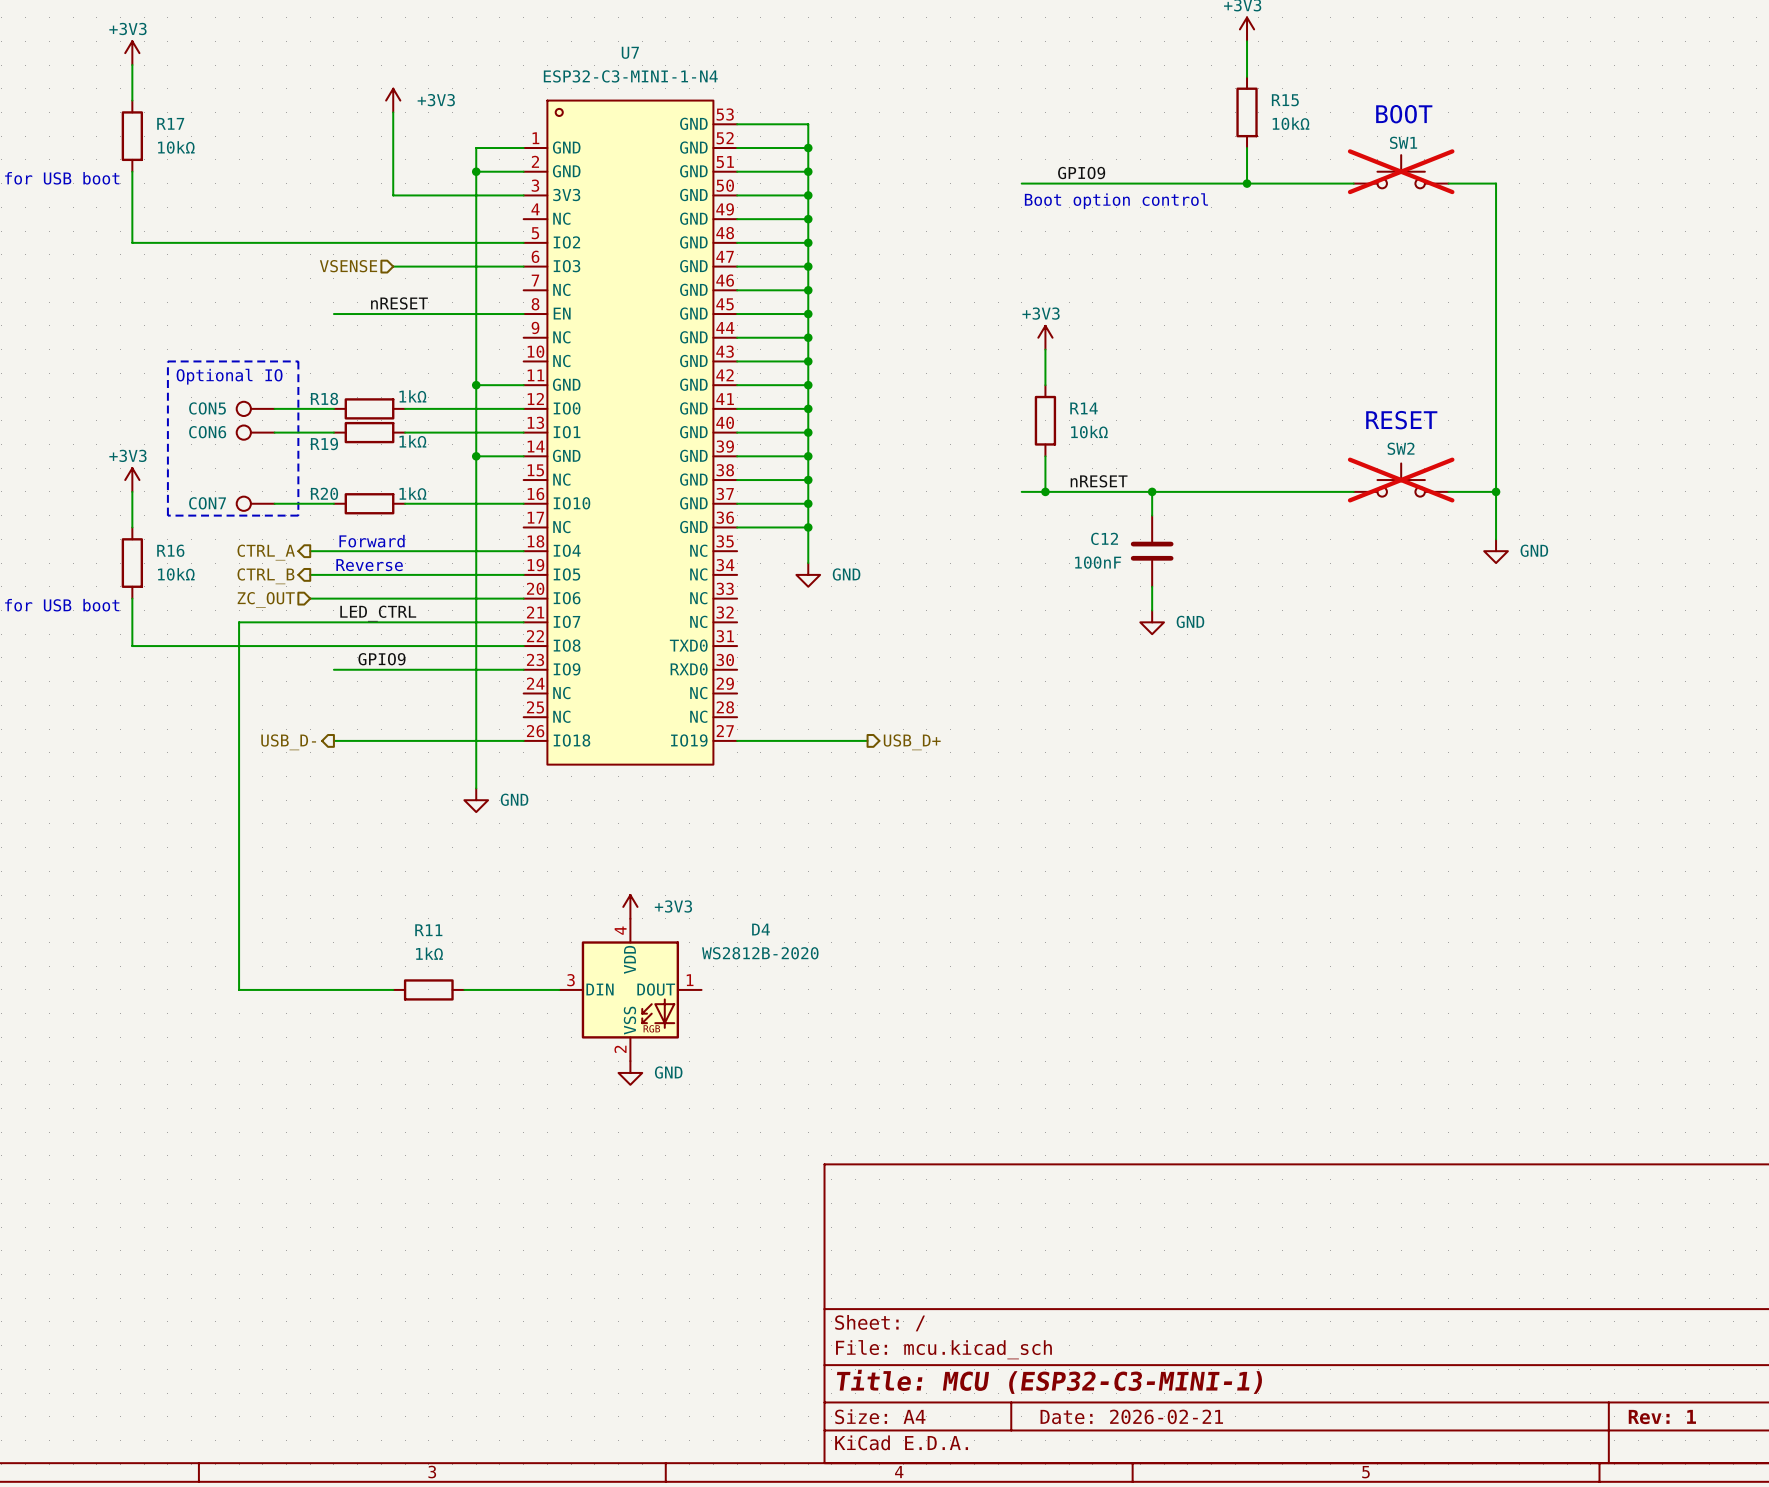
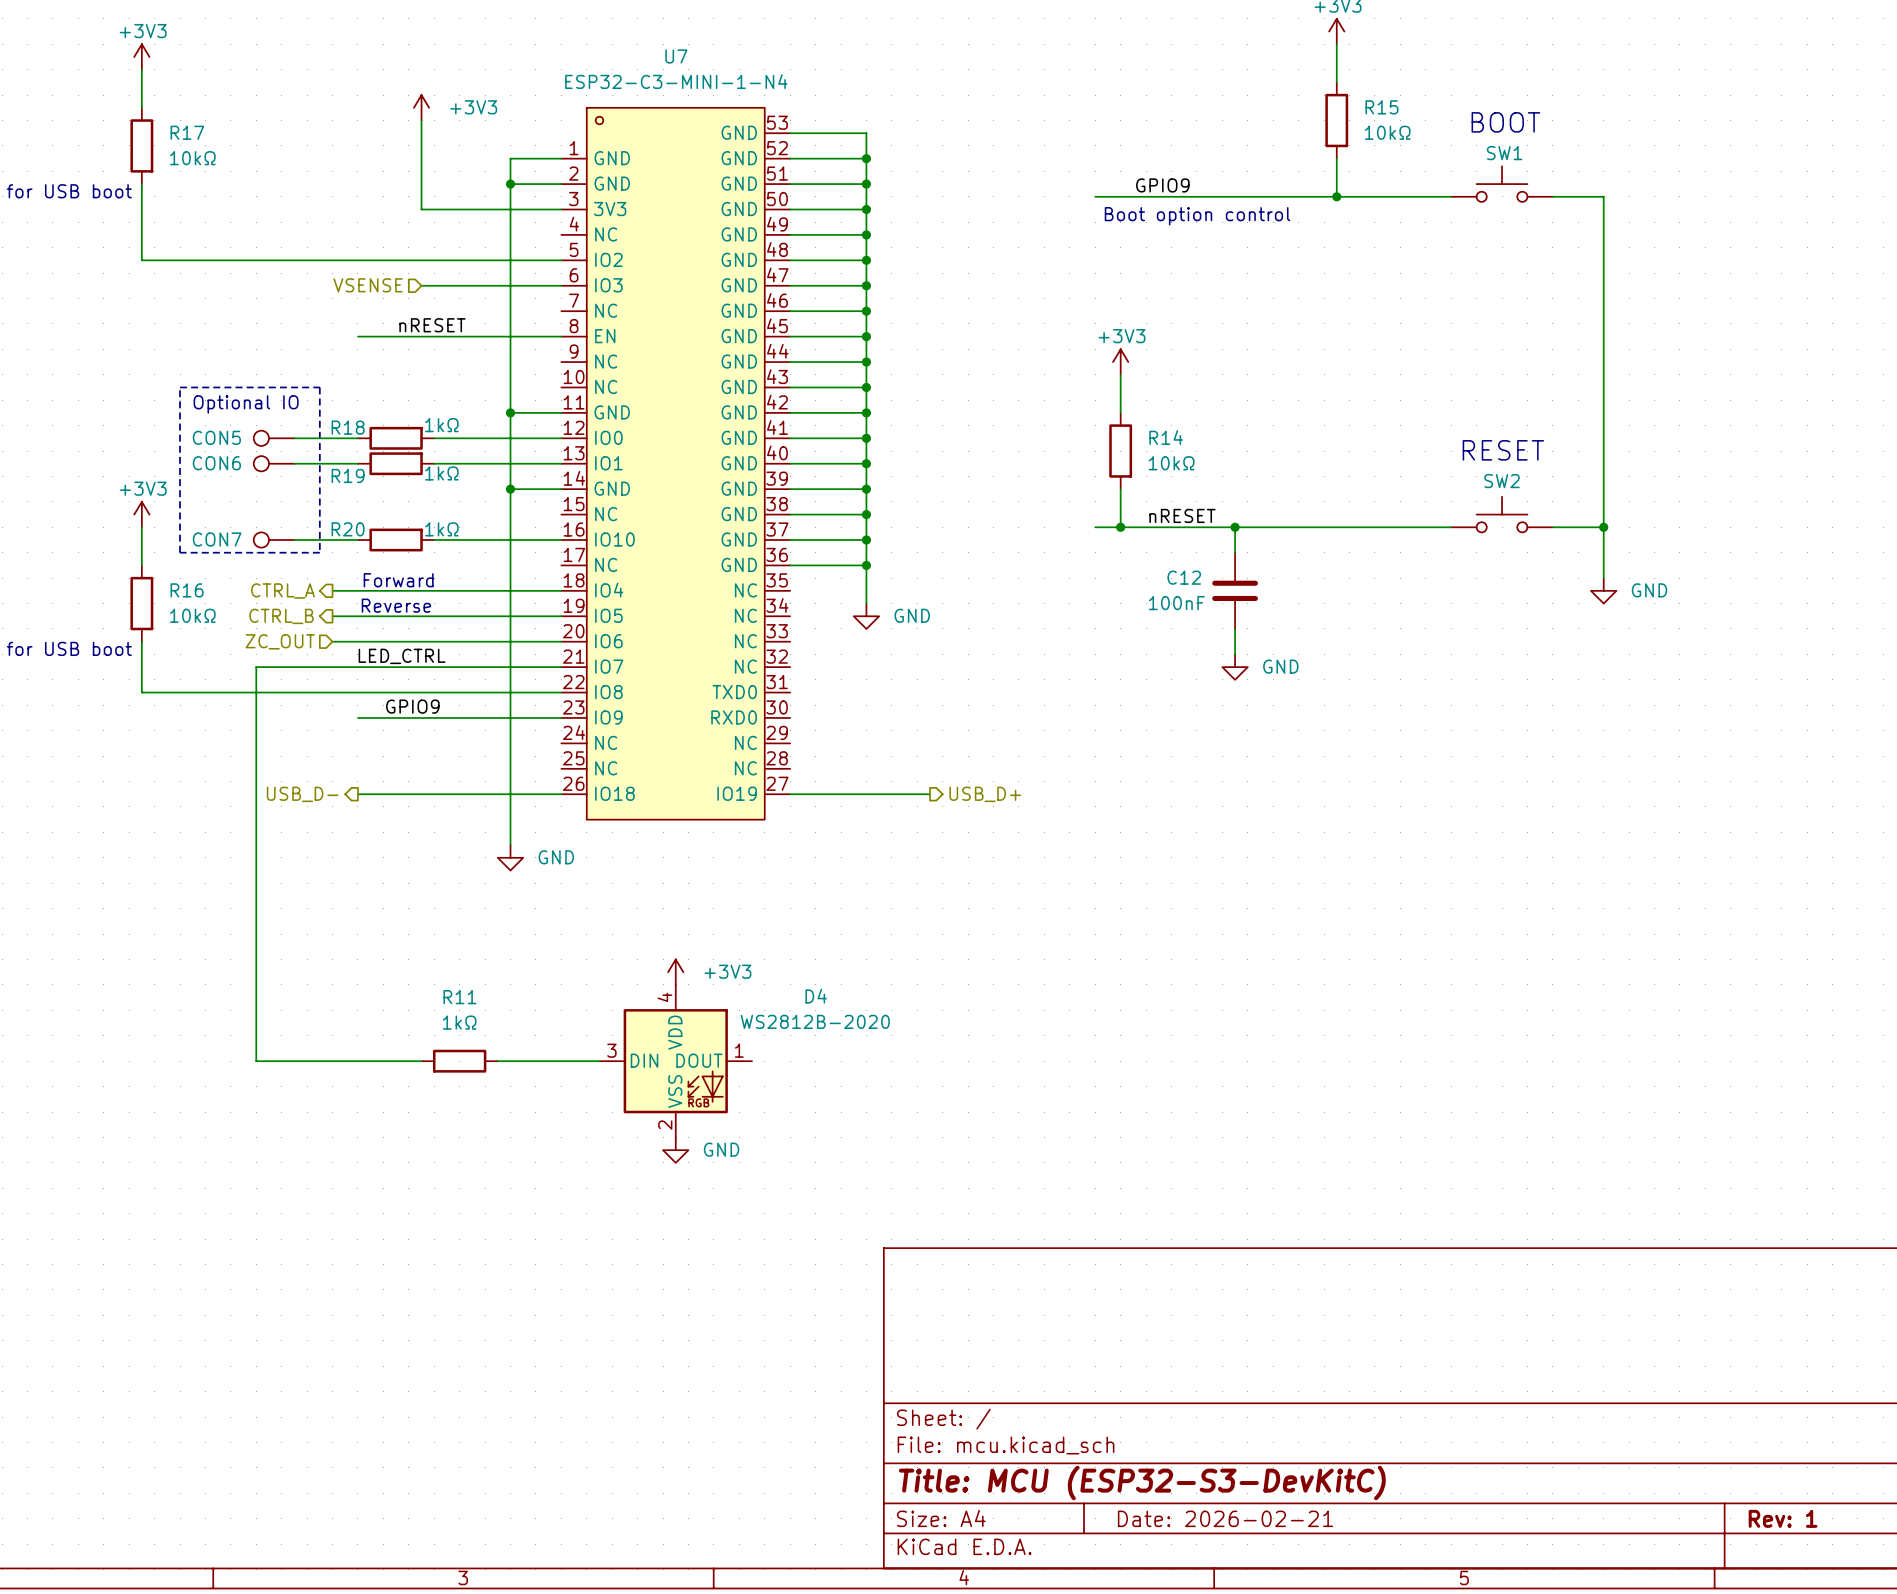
SW1 do-not-place cross: (1401, 171) -> none
SW2 do-not-place cross: (1401, 480) -> none
title block: Title: MCU (ESP32-C3-MINI-1) (1049, 1381) -> Title: MCU (ESP32-S3-DevKitC) (1142, 1483)

